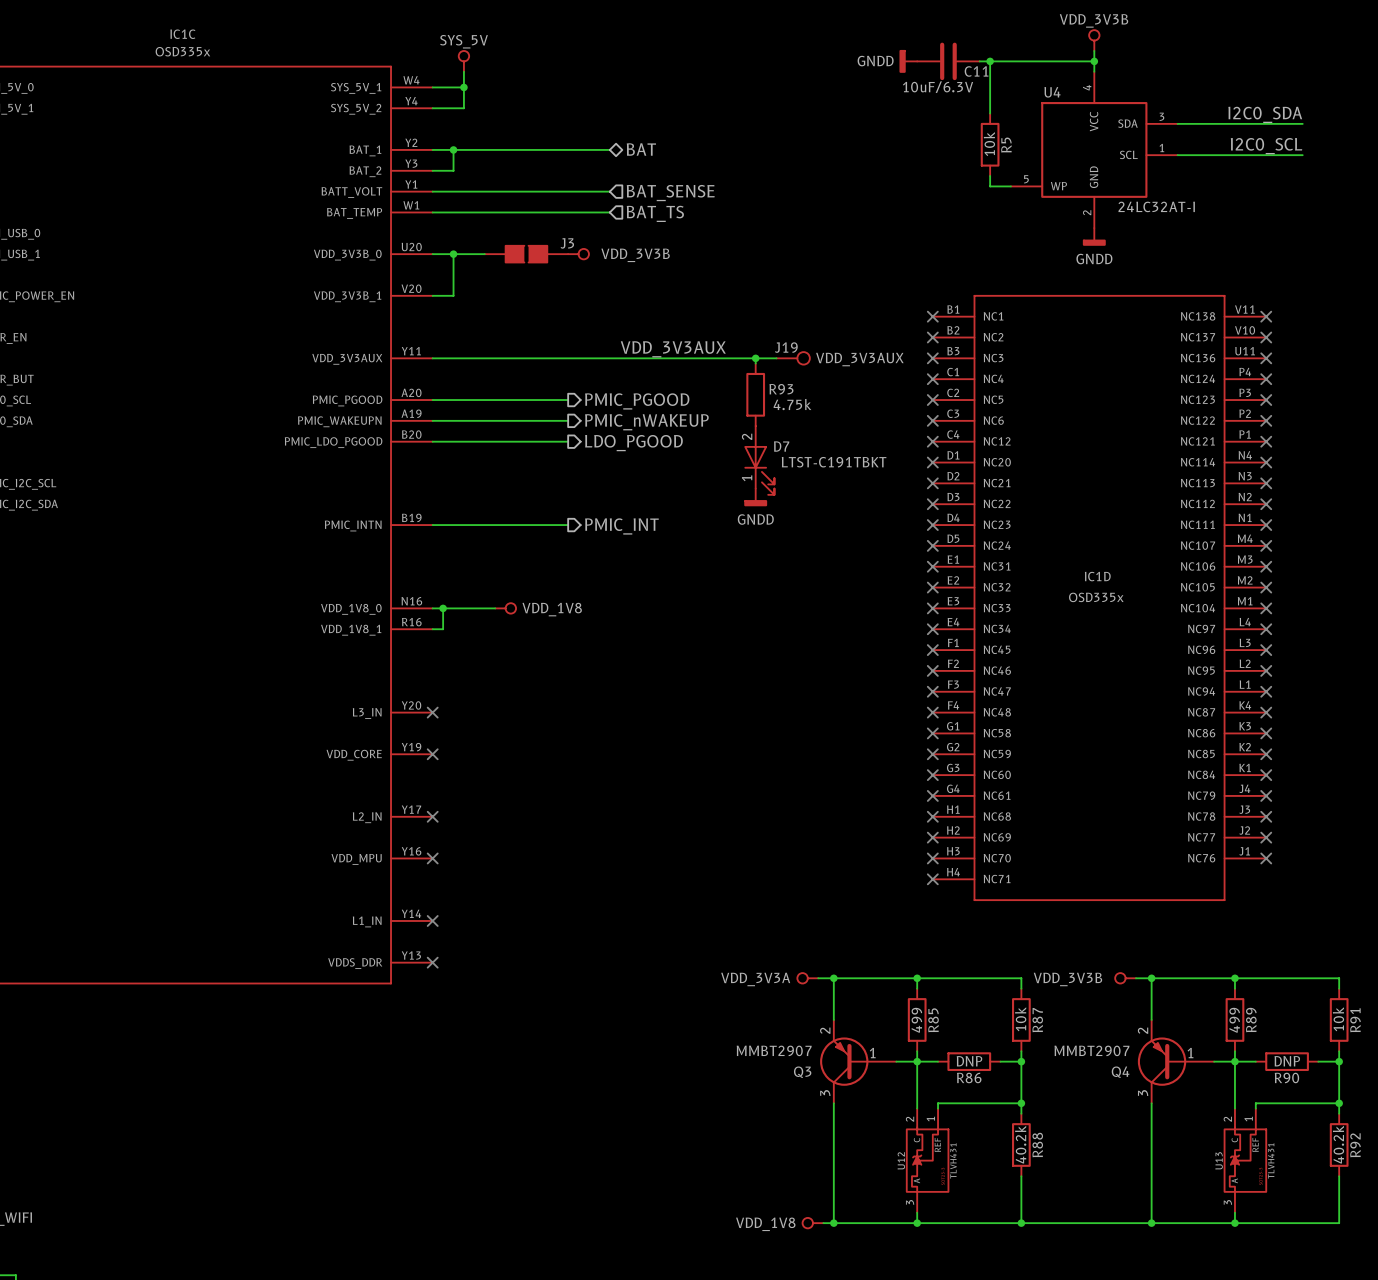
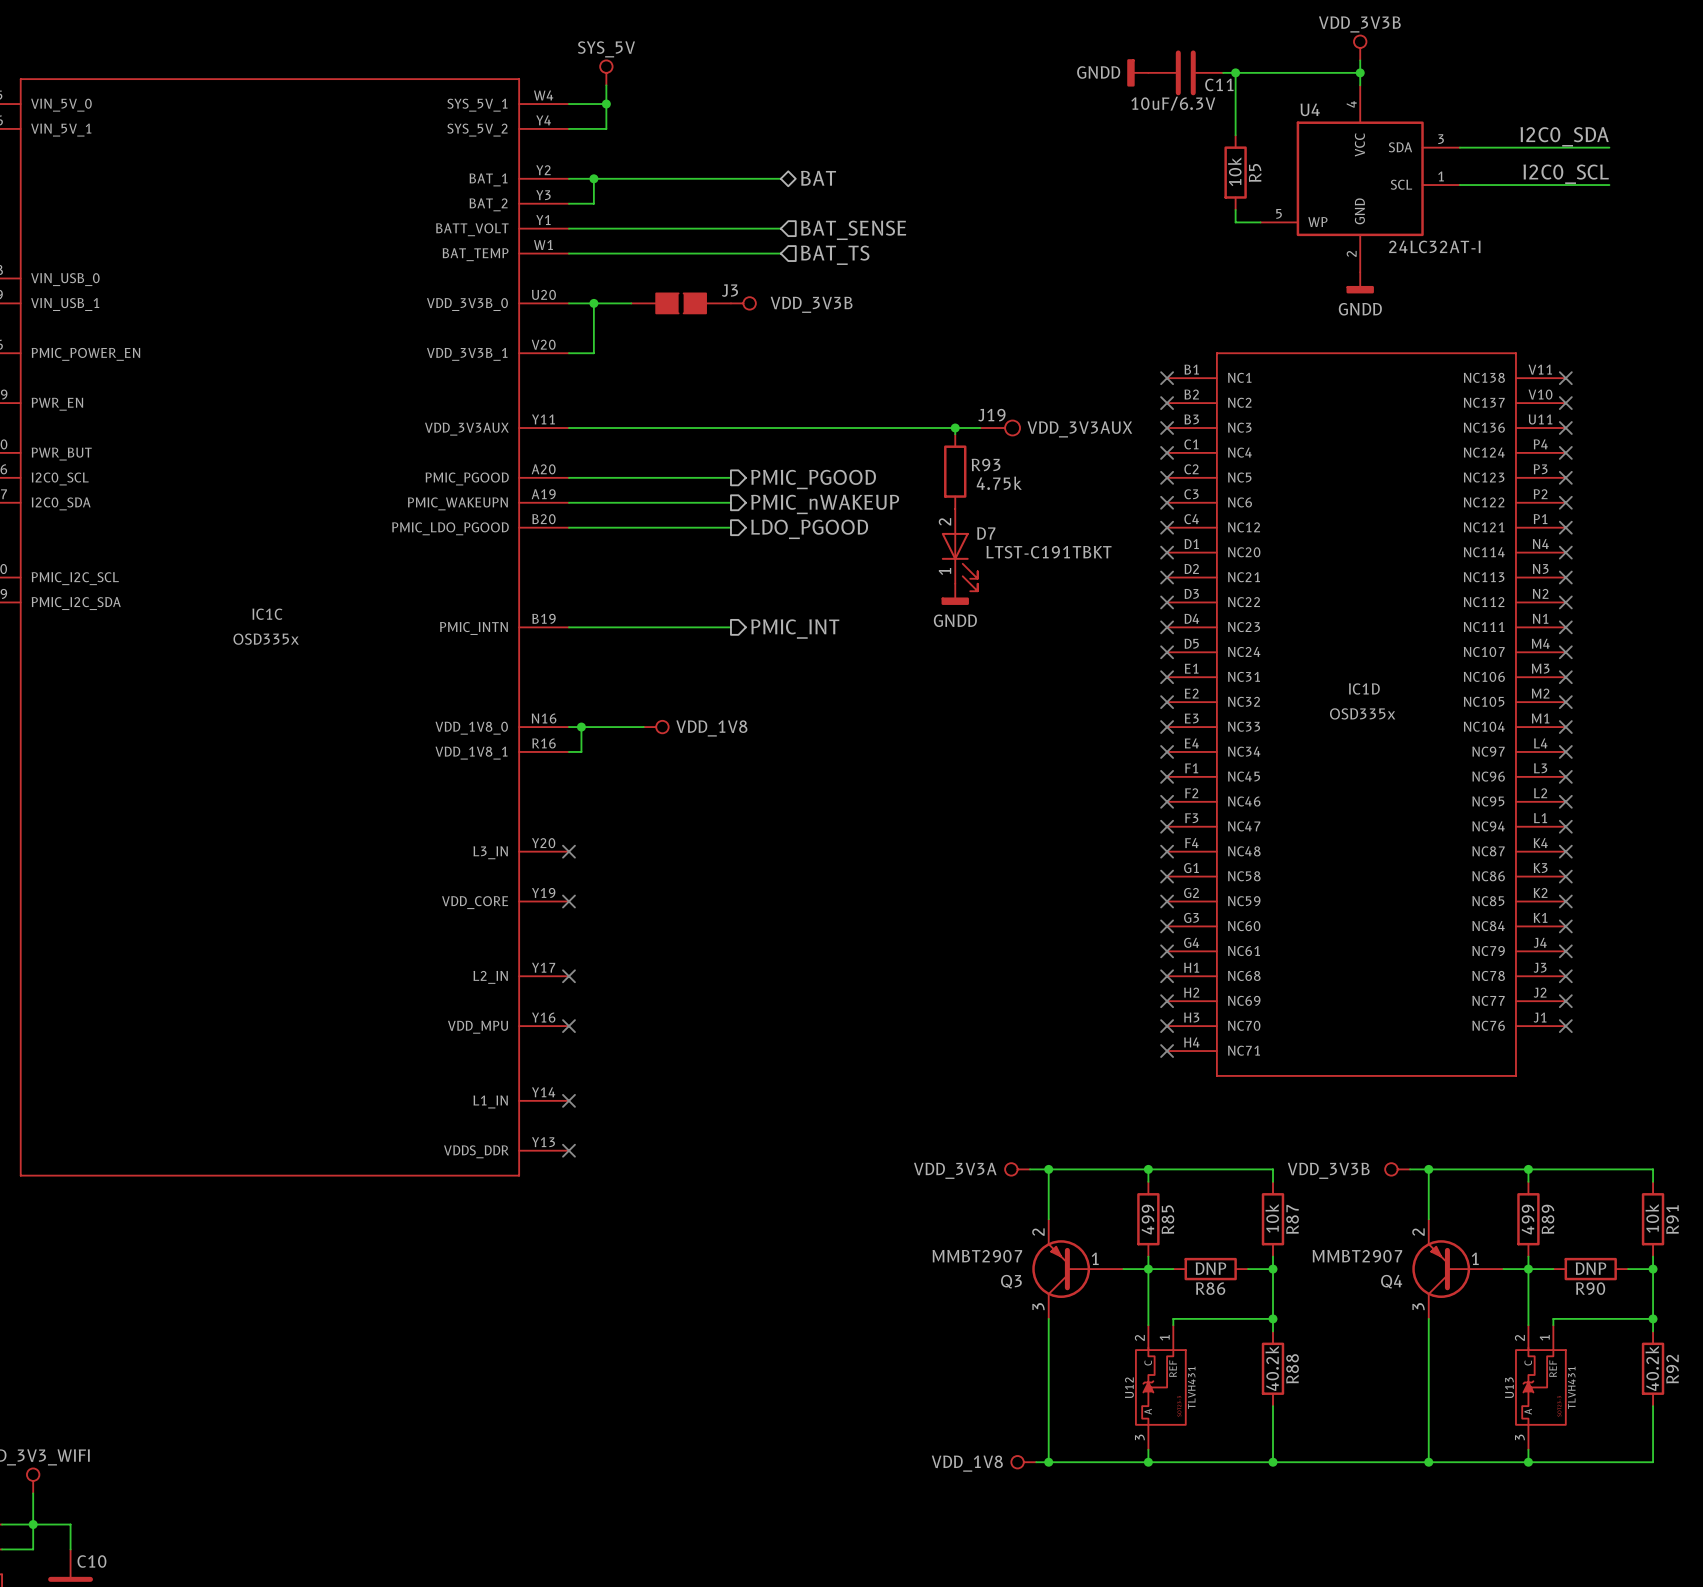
IC1C name position: IC1C (182, 34) -> IC1C (267, 614)
IC1C value position: OSD335x (182, 51) -> OSD335x (266, 639)
label: VDD_3V3AUX (673, 349) -> none

